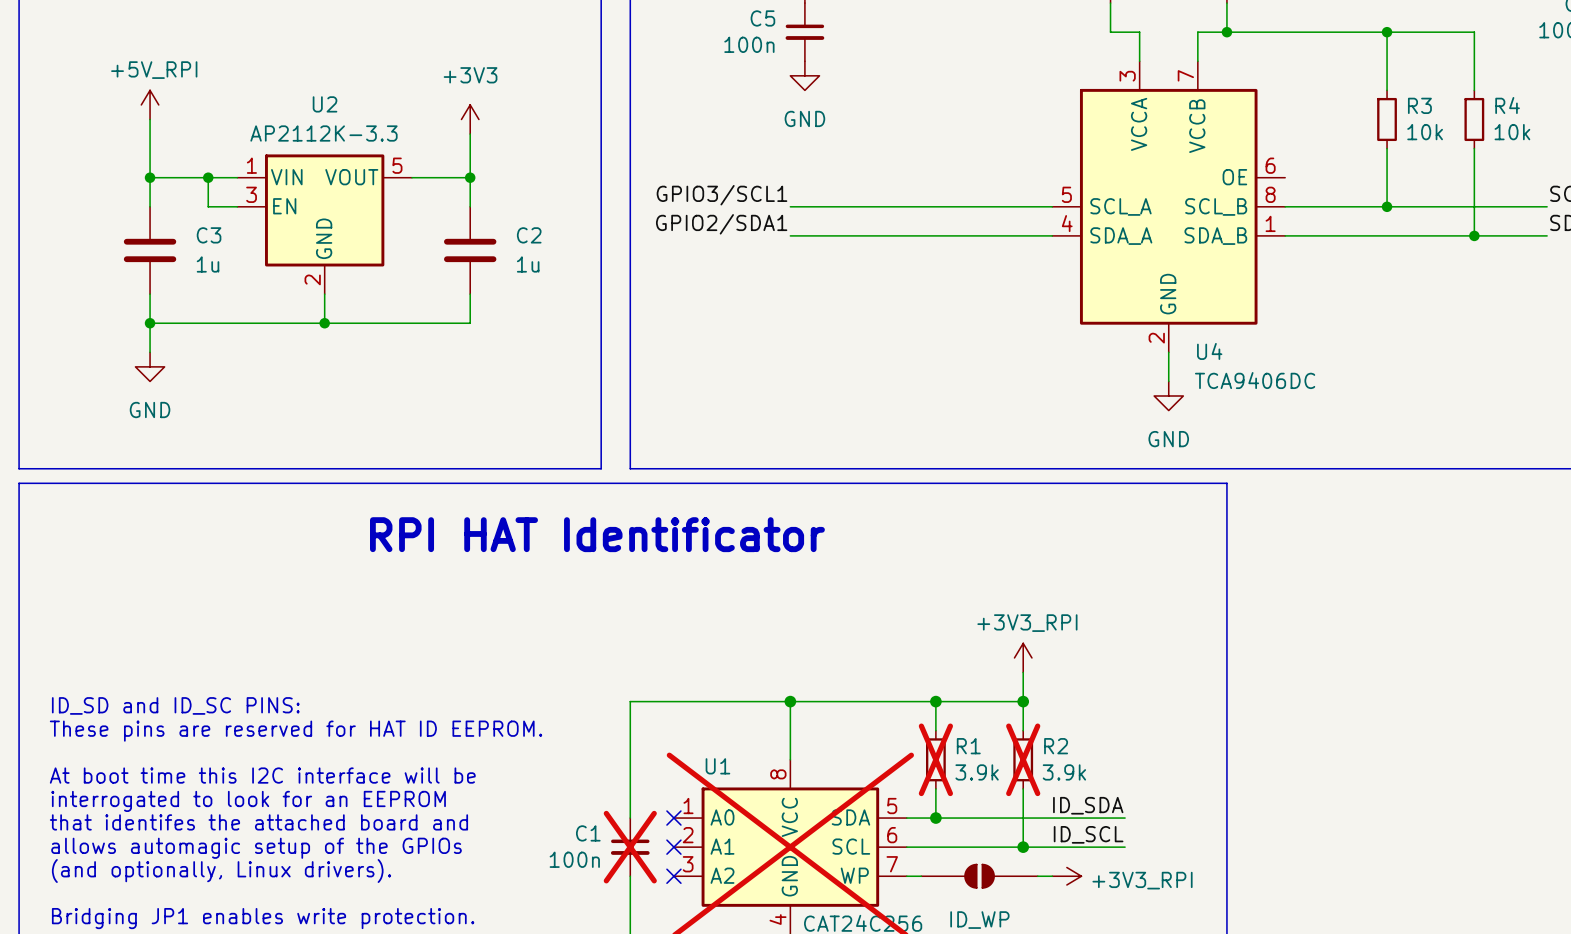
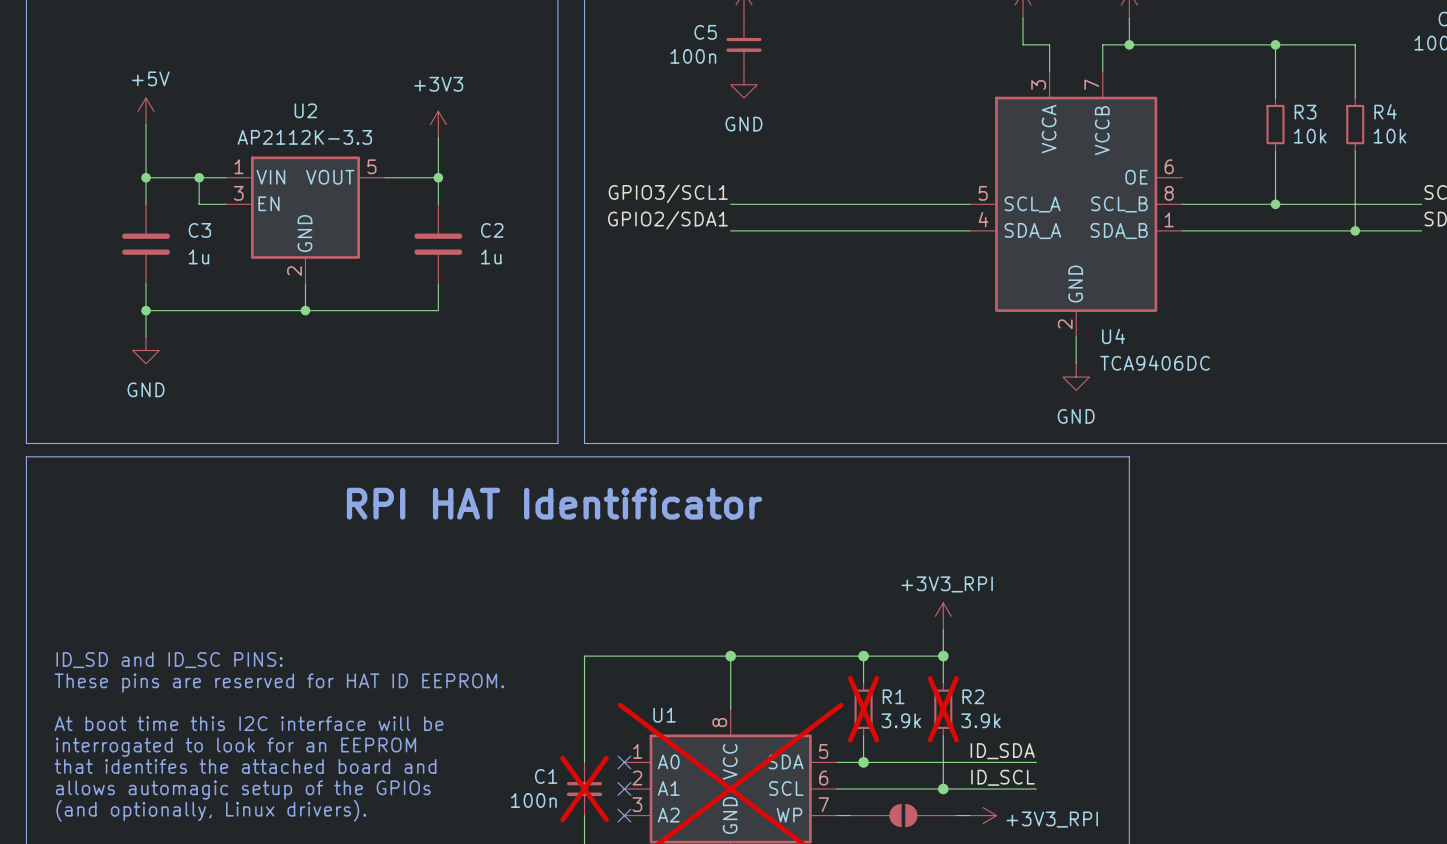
power symbol: +5V_RPI (150, 104) -> +5V (146, 111)

